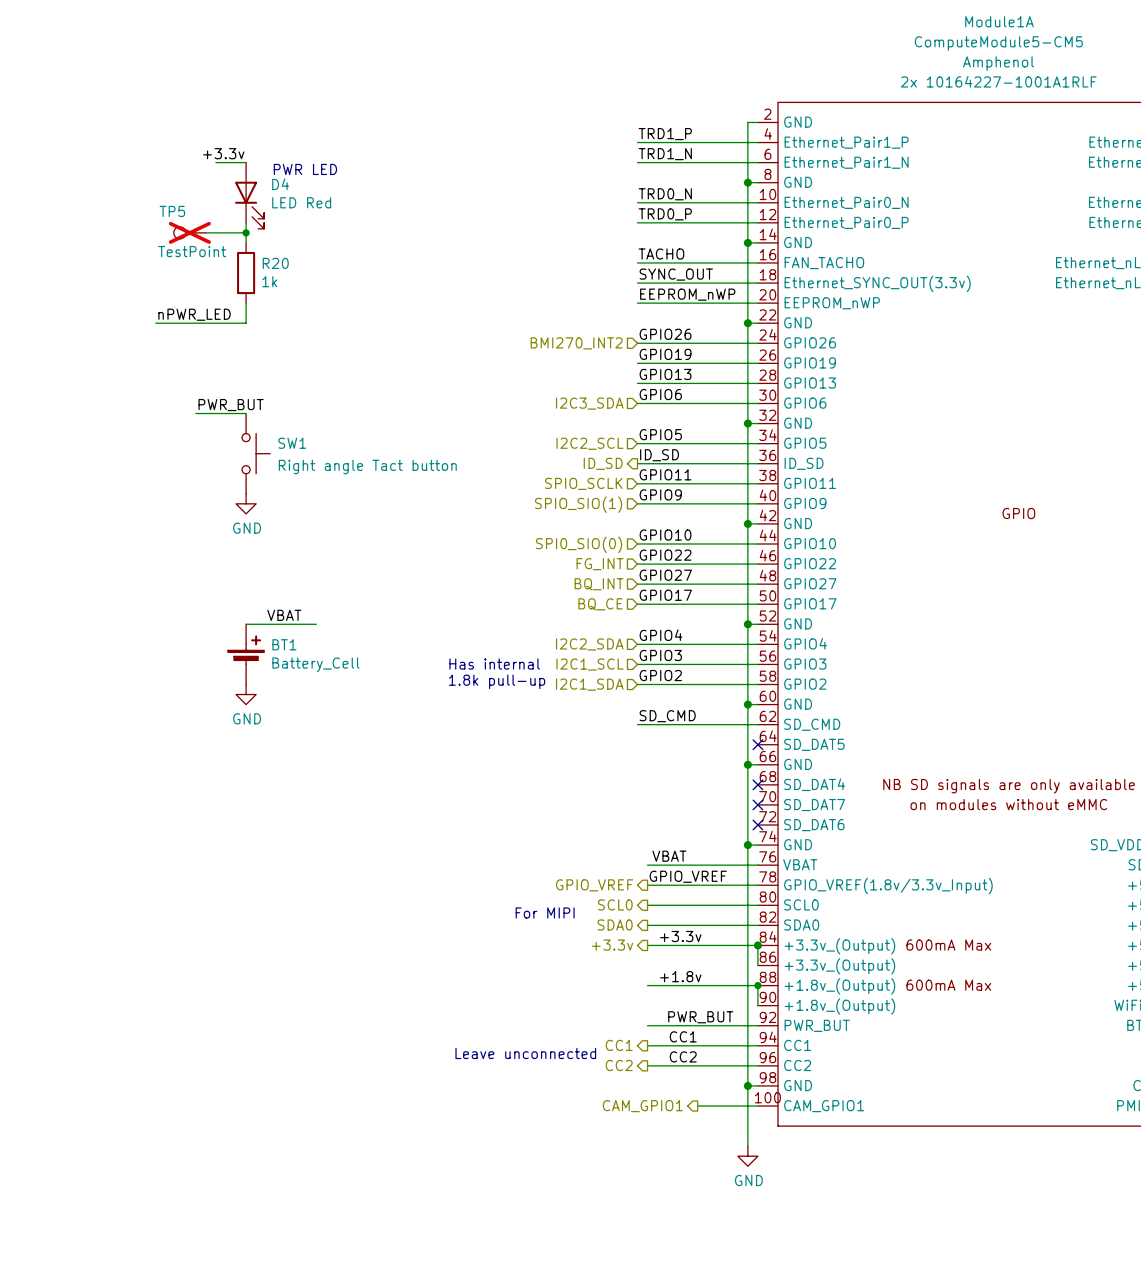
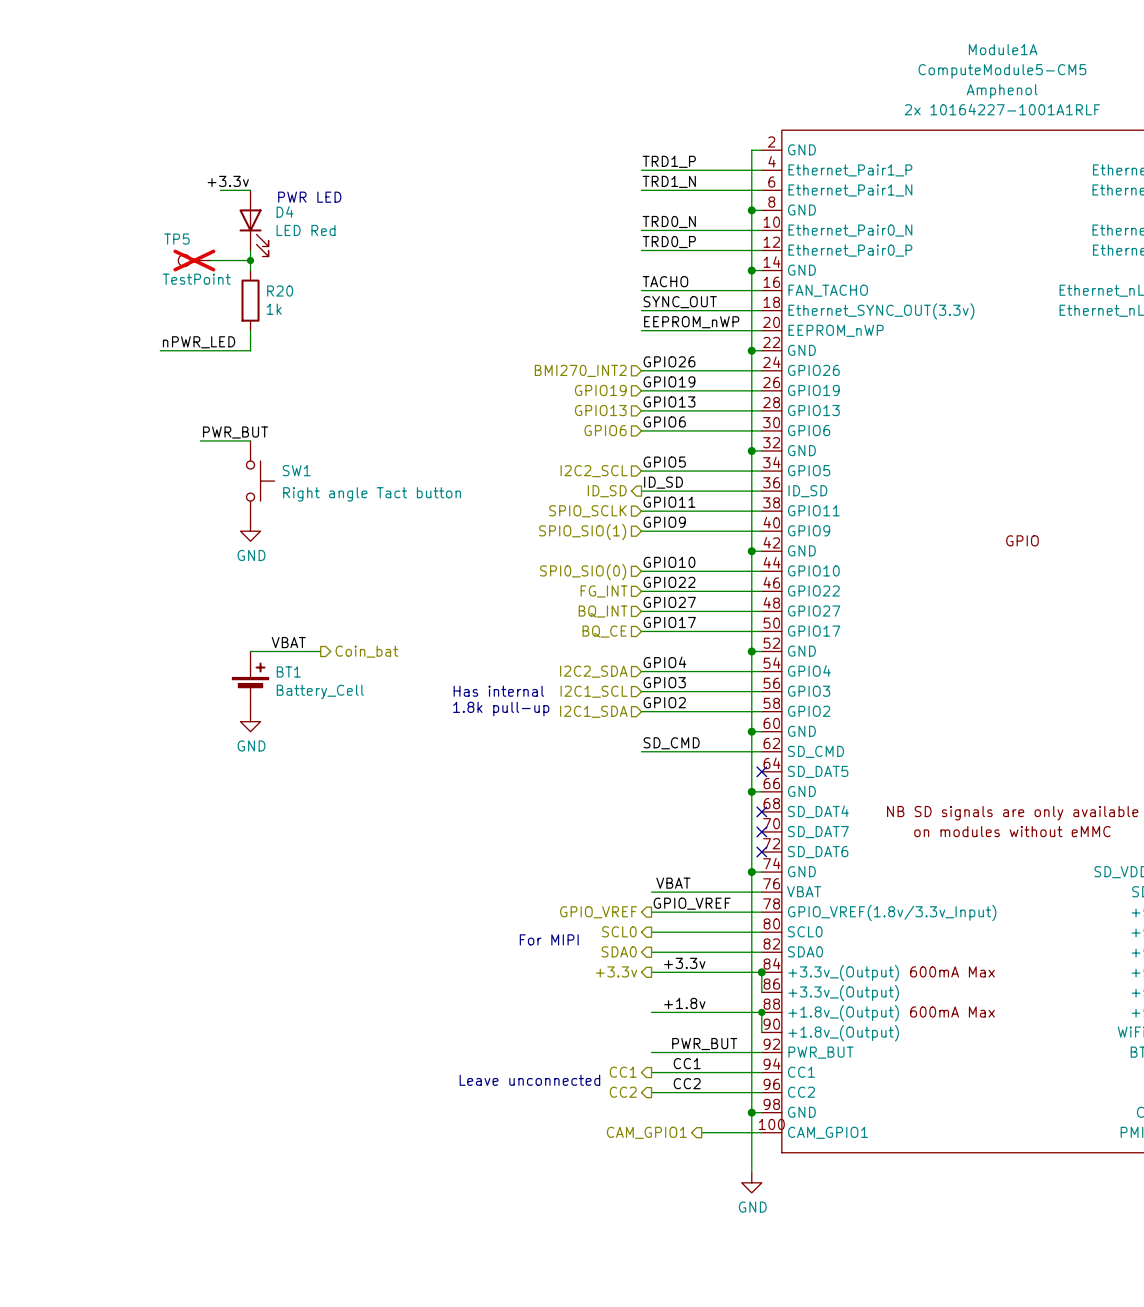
hierarchical label: none -> GPIO19 (600, 390)
hierarchical label: none -> GPIO13 (600, 410)
hierarchical label: I2C3_SDA (589, 403) -> GPIO6 (605, 430)
hierarchical label: none -> Coin_bat (366, 651)

